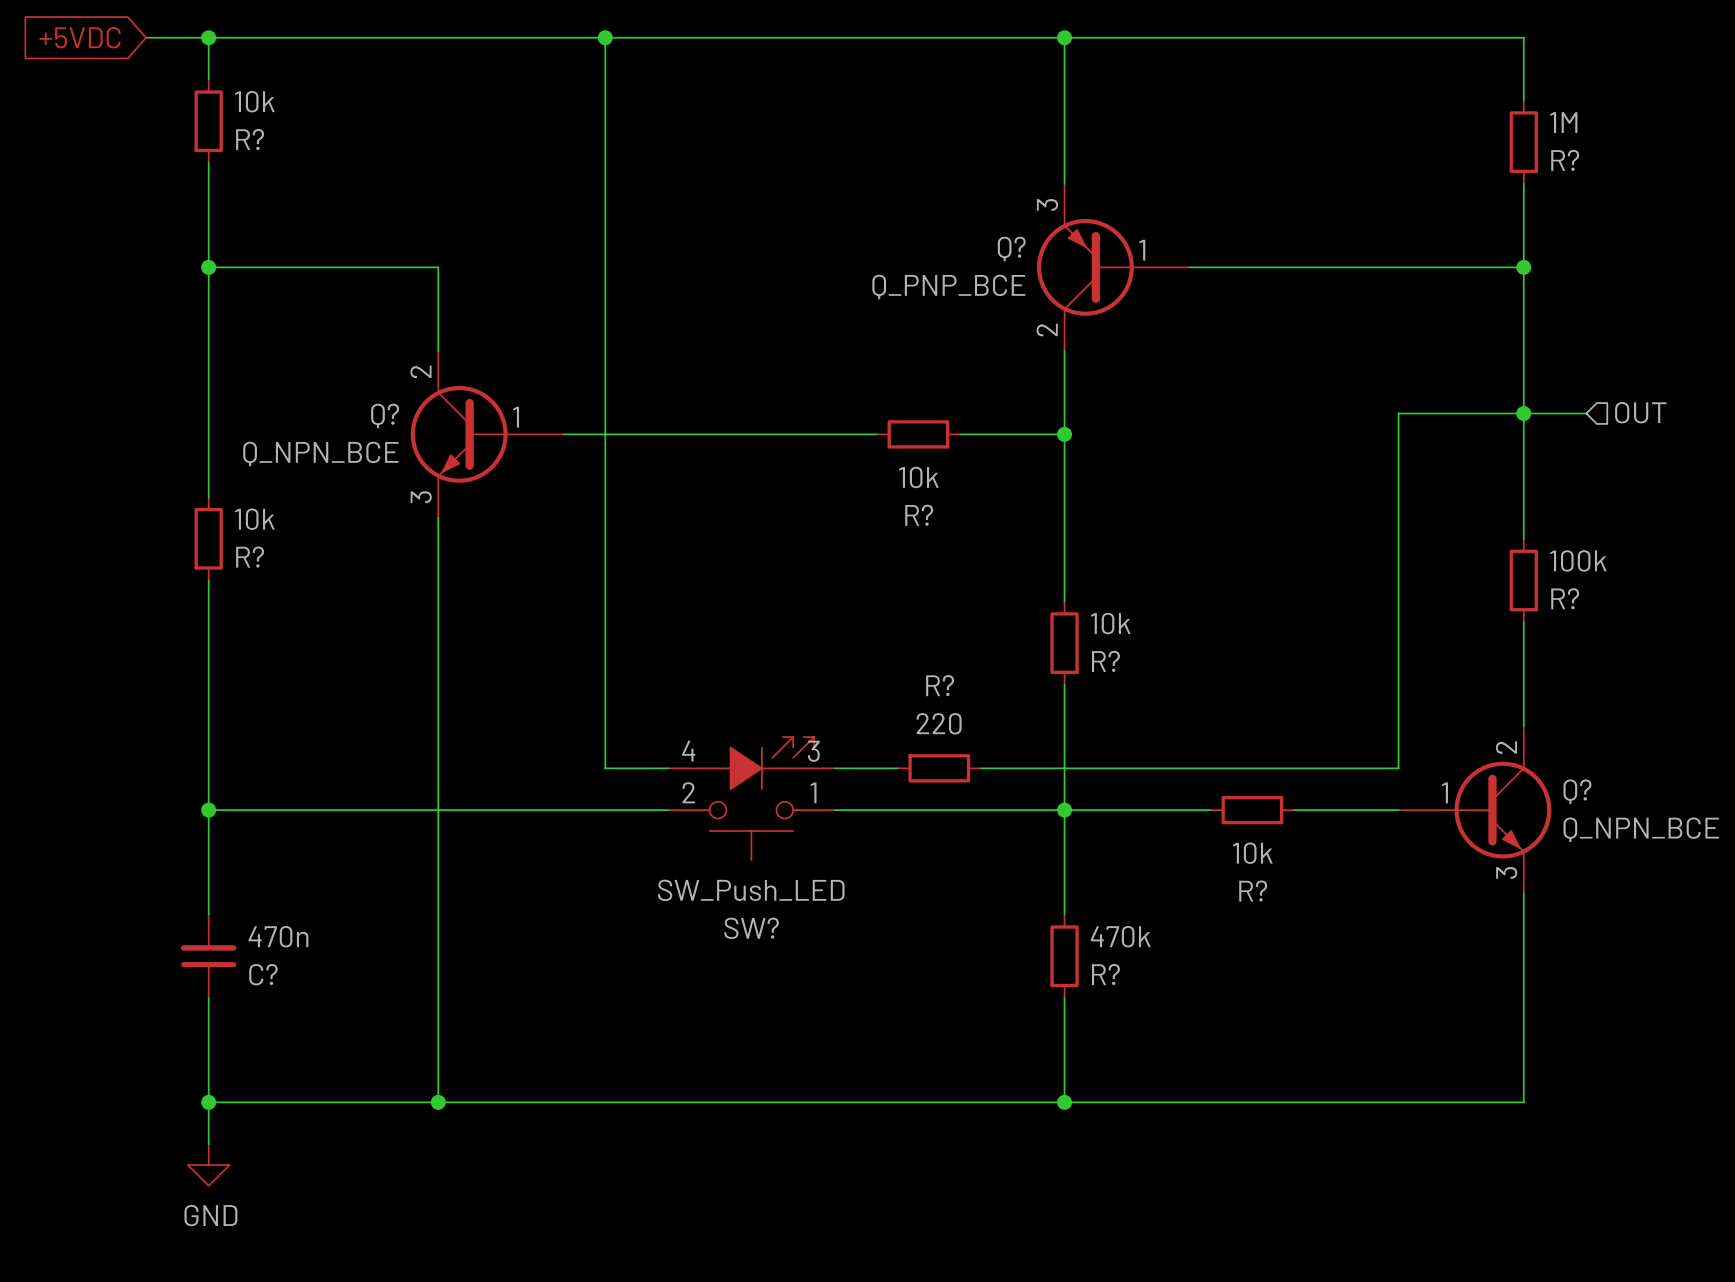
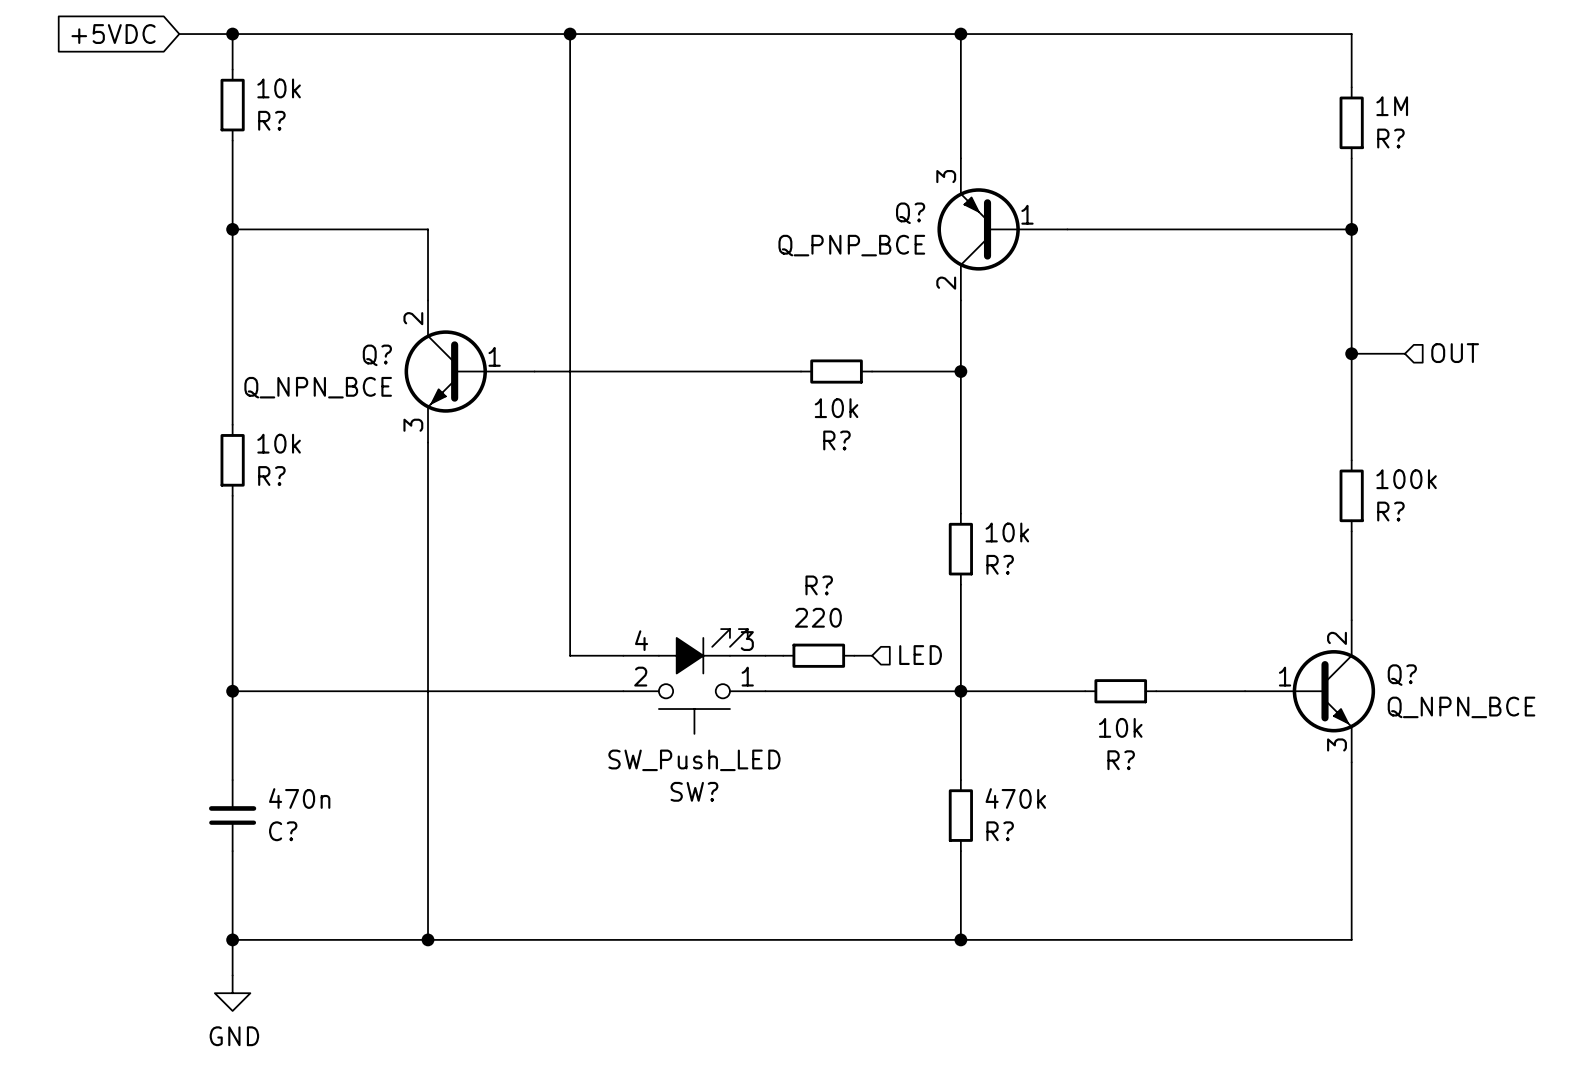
wire: (1523, 413) (1398, 413) (1398, 768) (981, 768) -> none
hierarchical label: none -> LED (920, 655)
wire: (855, 768) (897, 768) -> none
wire: none -> (854, 655) (872, 655)
R? position: (939, 768) -> (818, 655)

